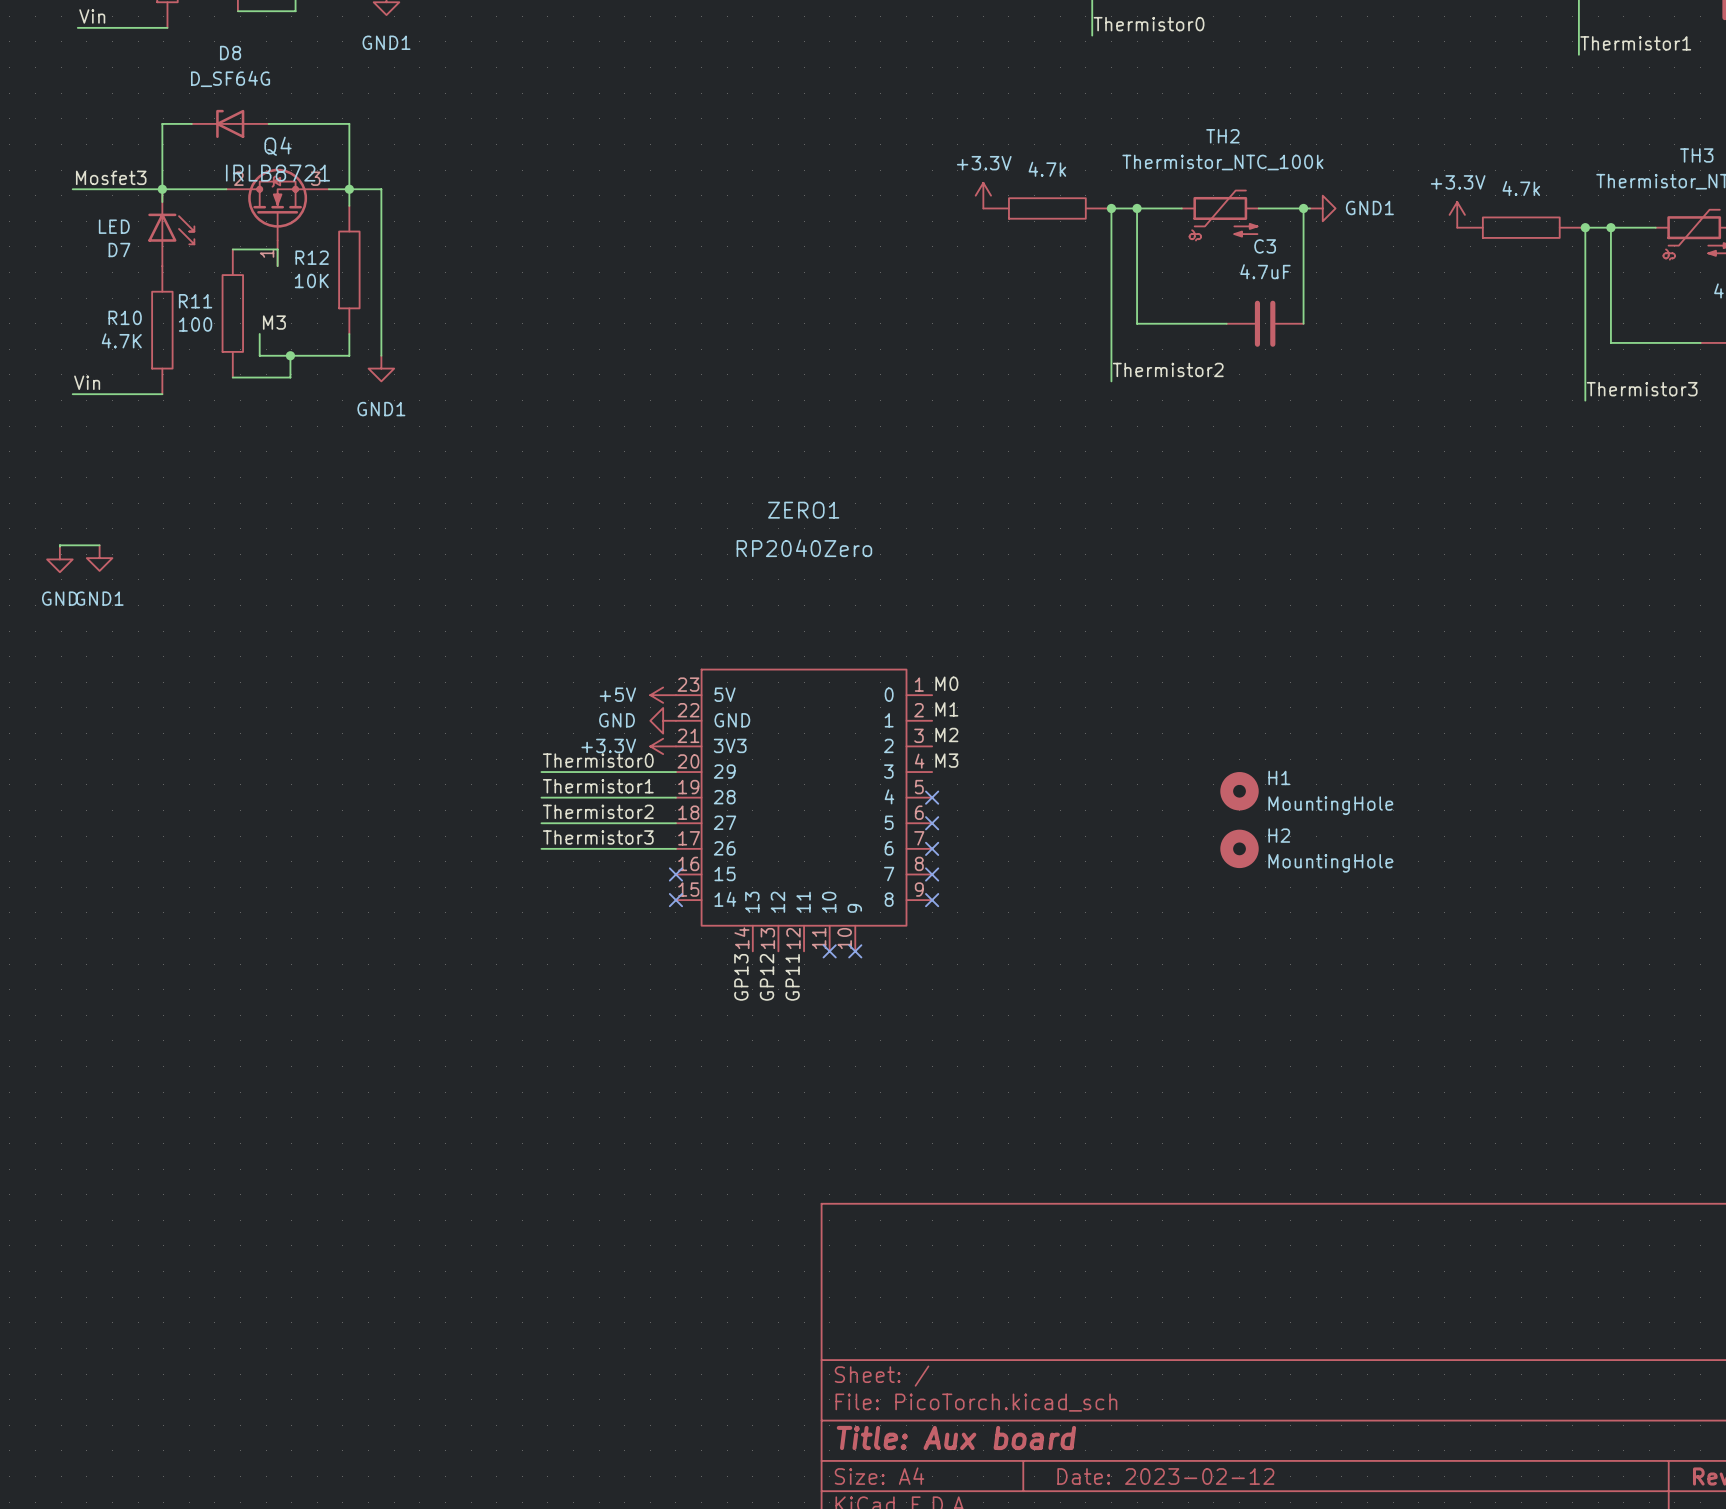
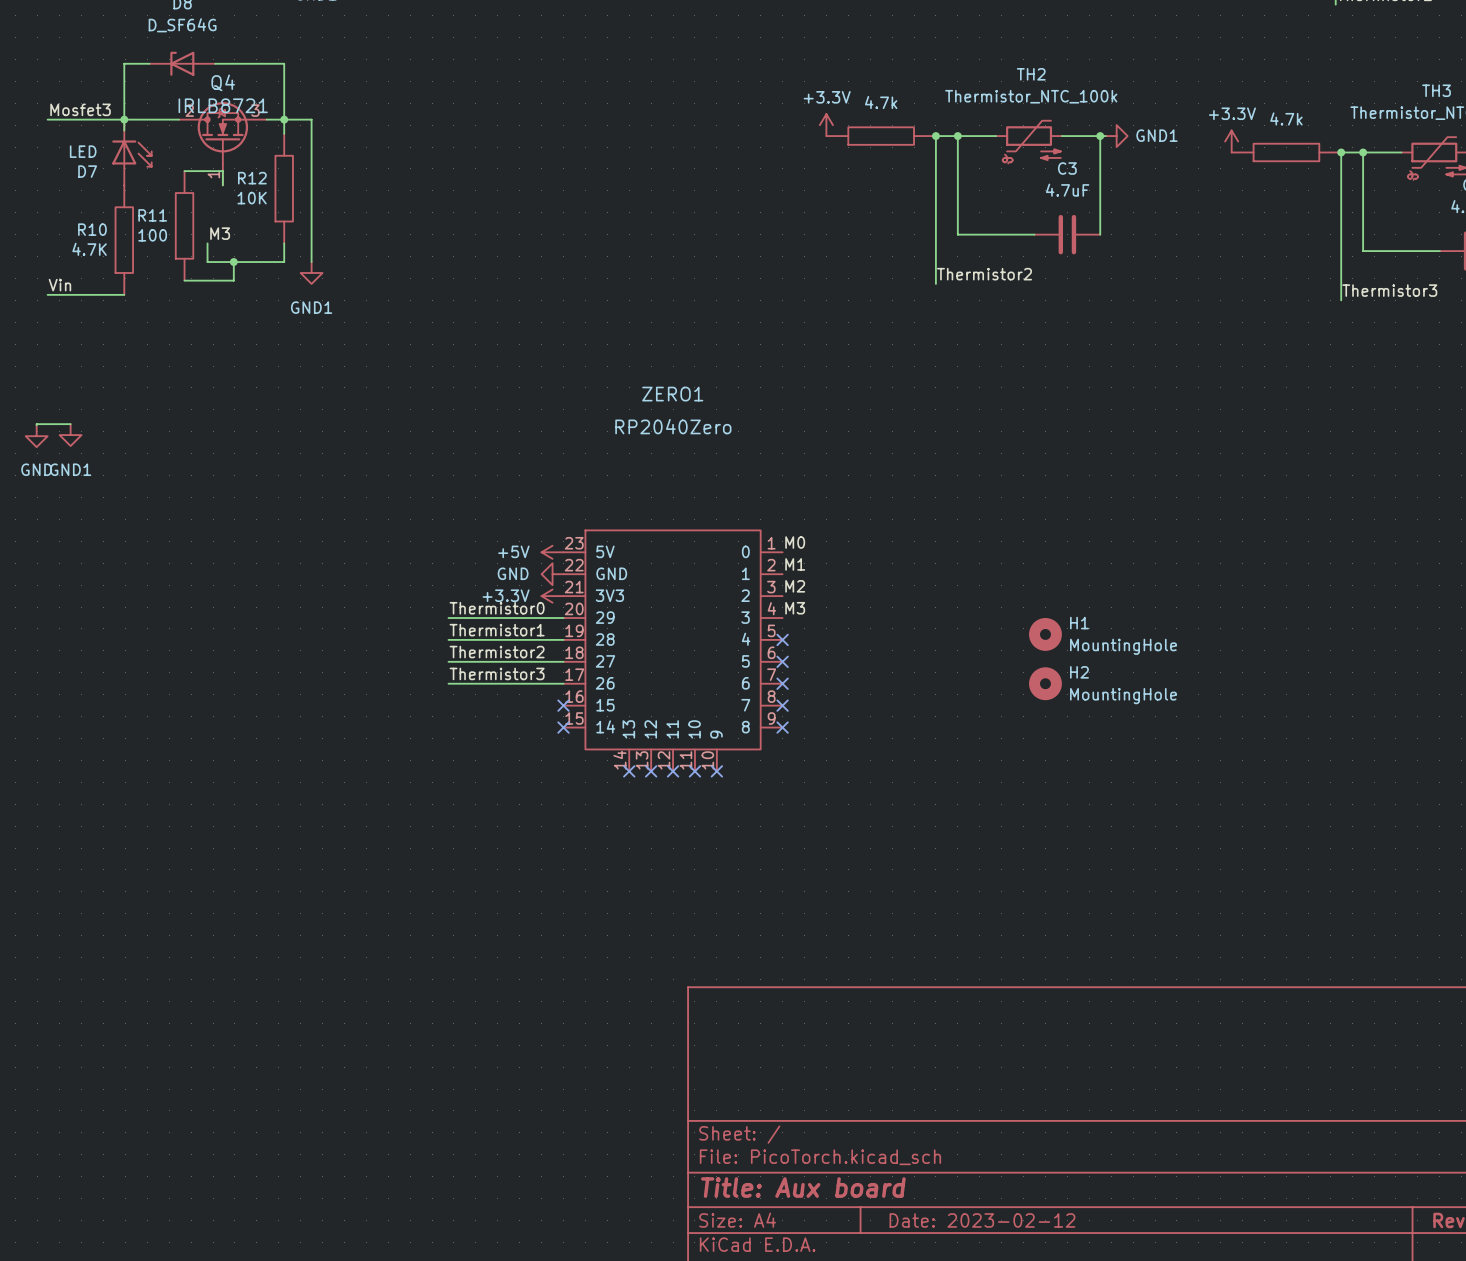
no-connect mark: none -> (629, 771)
no-connect mark: none -> (651, 771)
no-connect mark: none -> (673, 771)
label: GP13 (741, 977) -> none
label: GP12 (766, 977) -> none
label: GP11 (792, 977) -> none

